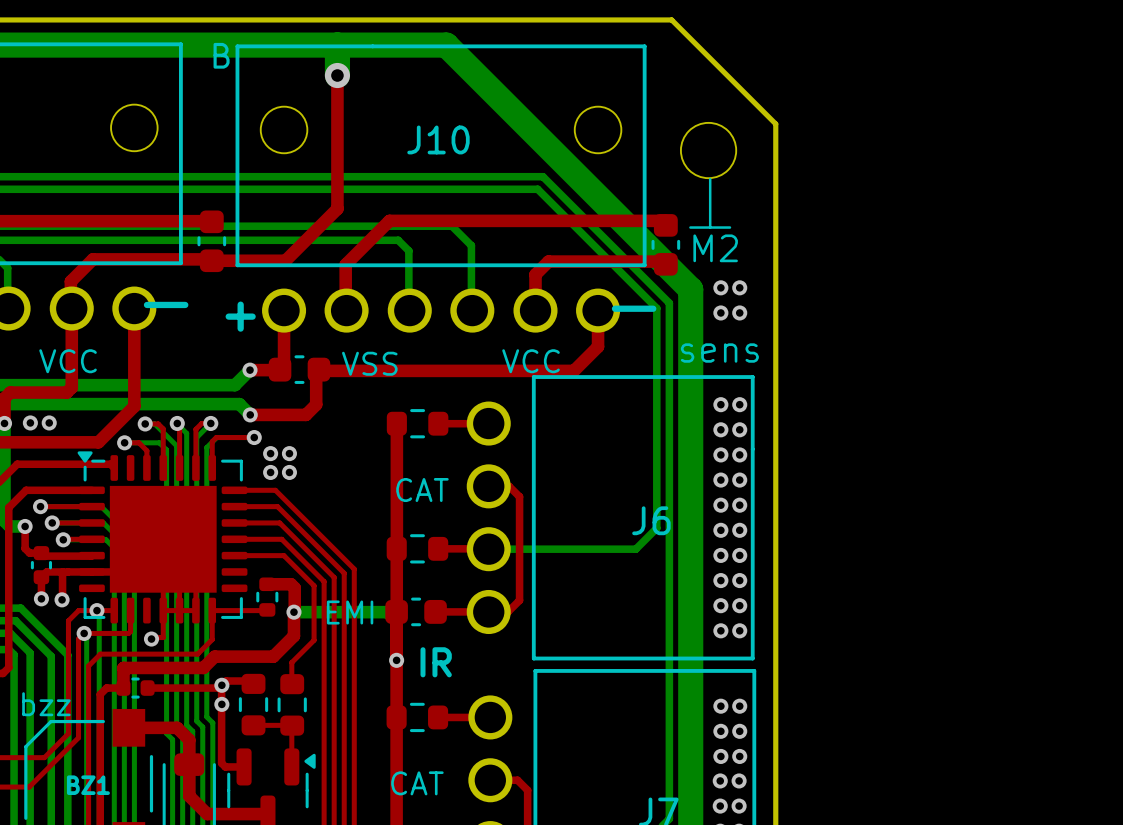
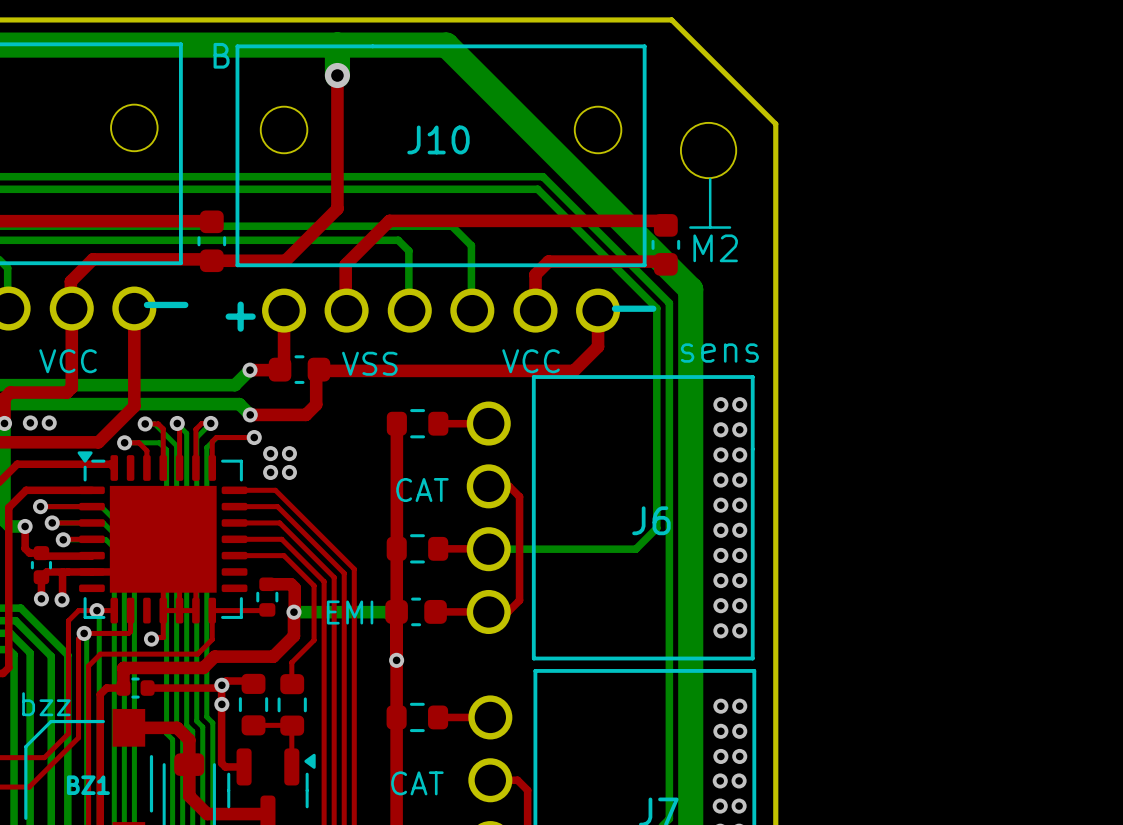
via: (720, 287) -> none
via: (739, 287) -> none
via: (720, 312) -> none
via: (739, 312) -> none
text: IR (436, 662) -> none

